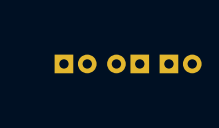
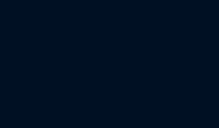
part: (75, 63) -> none
part: (128, 63) -> none
part: (180, 63) -> none

